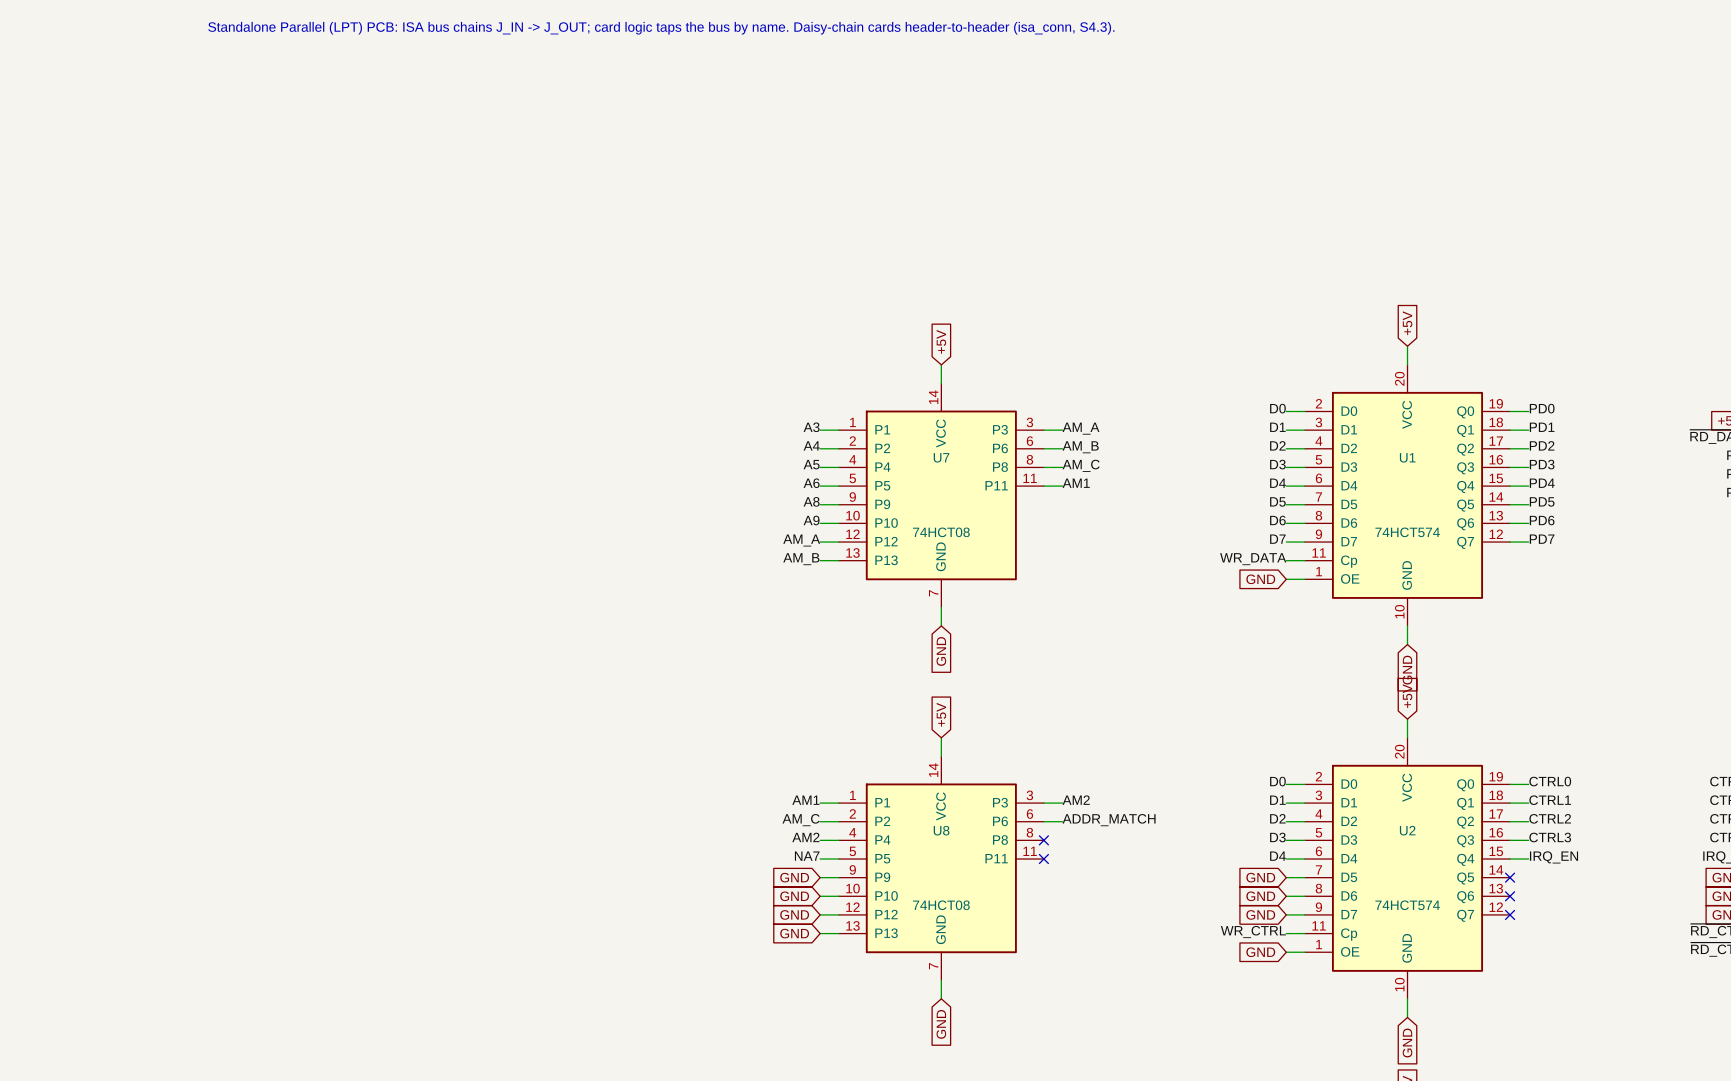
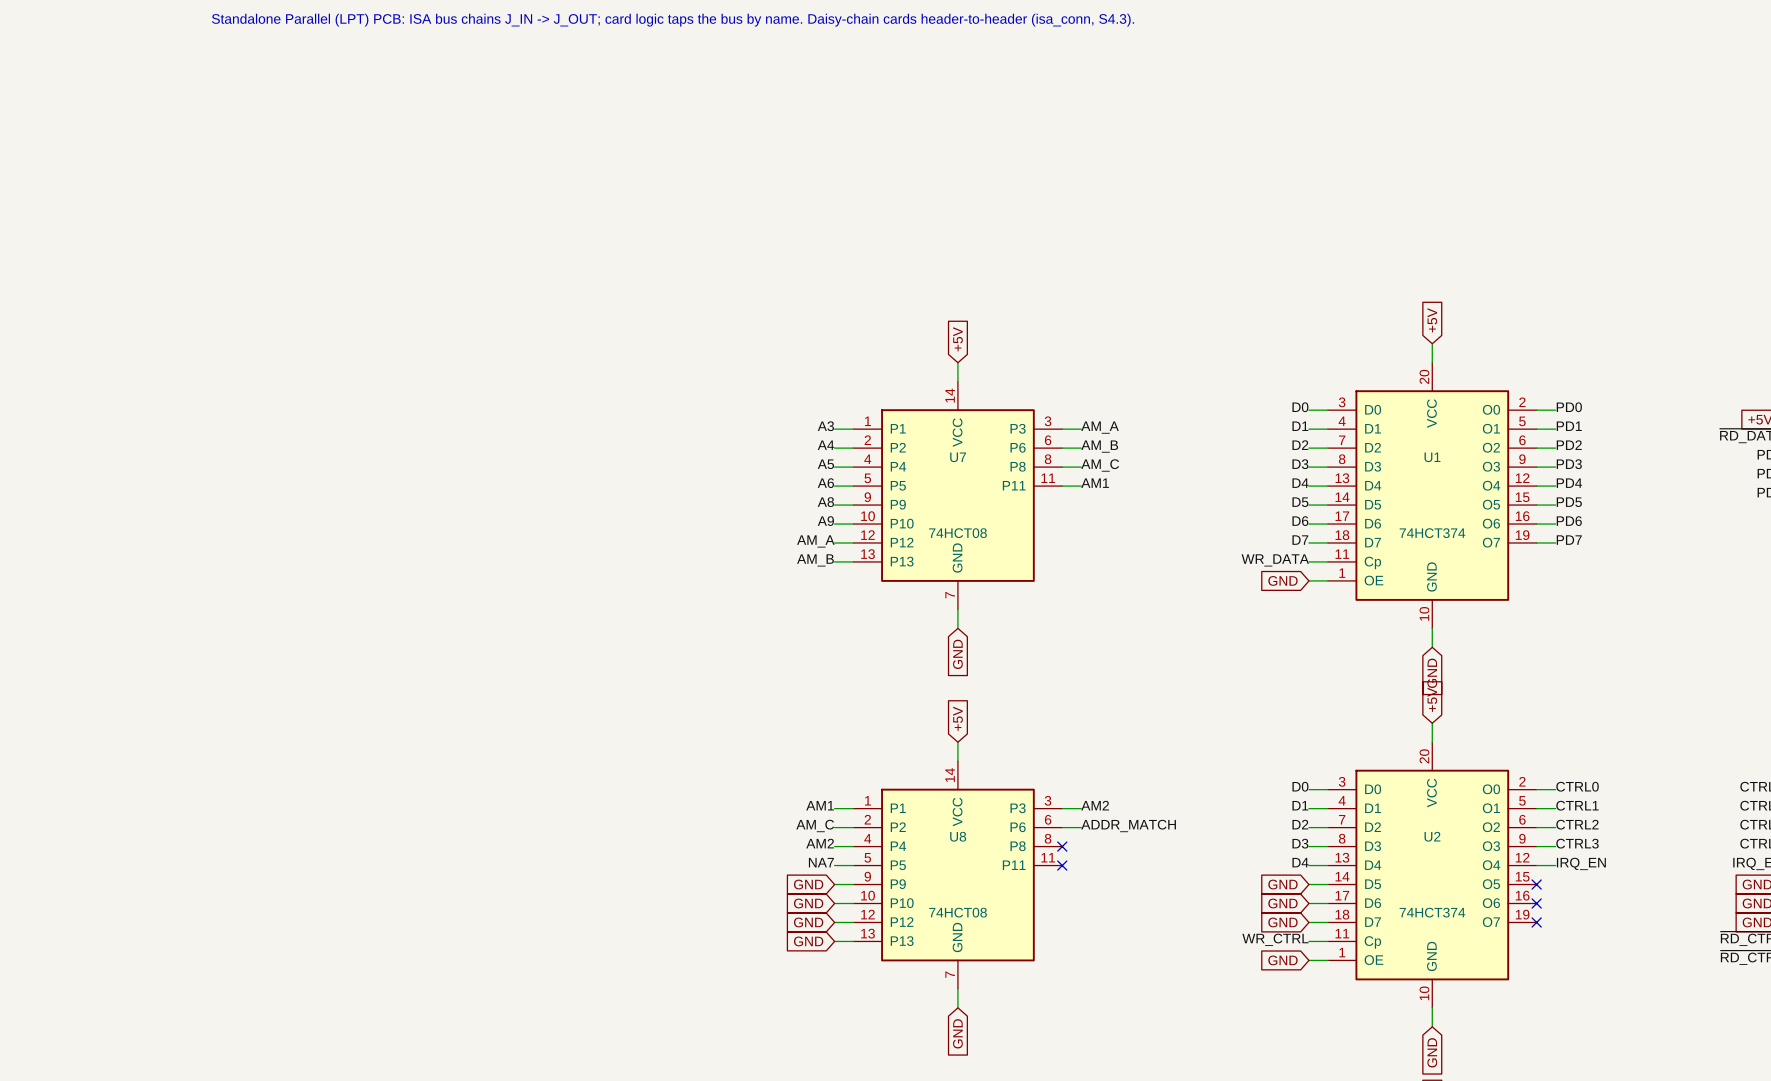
U1 symbol: [1304, 364, 1511, 626] -> [1327, 362, 1537, 629]
U1 value: 74HCT574 (1407, 532) -> 74HCT374 (1432, 533)
U2 symbol: [1304, 737, 1511, 999] -> [1327, 742, 1537, 1008]
U2 value: 74HCT574 (1407, 905) -> 74HCT374 (1432, 912)

